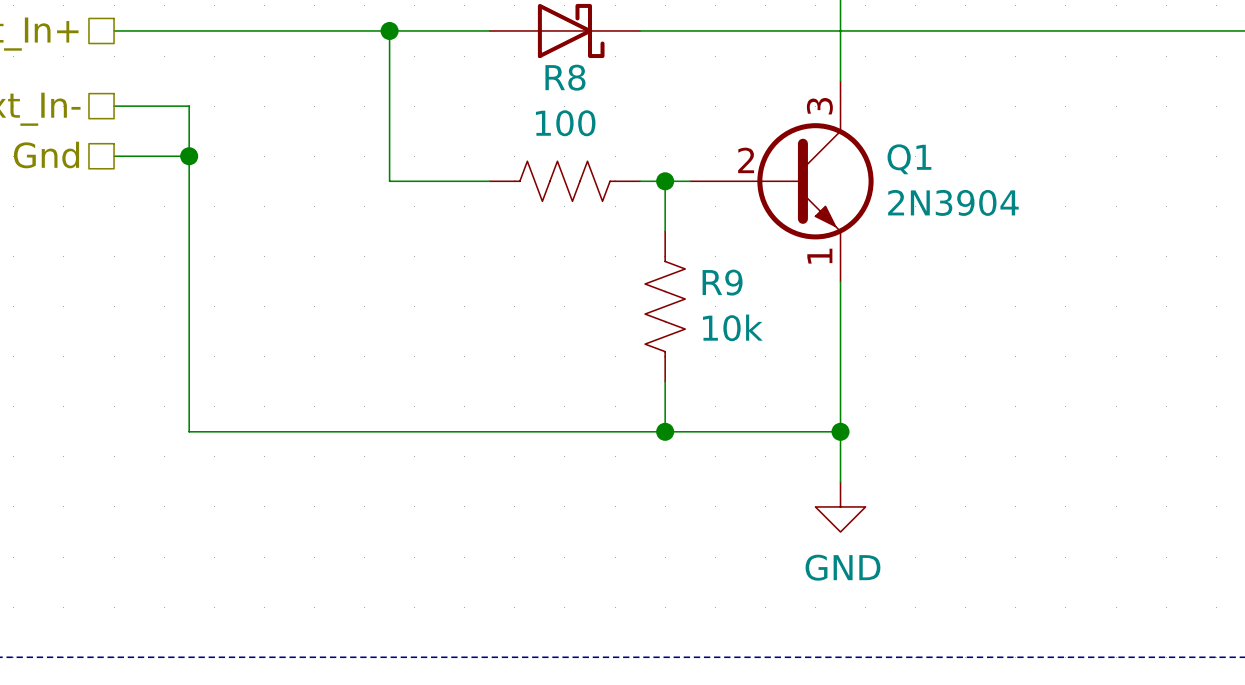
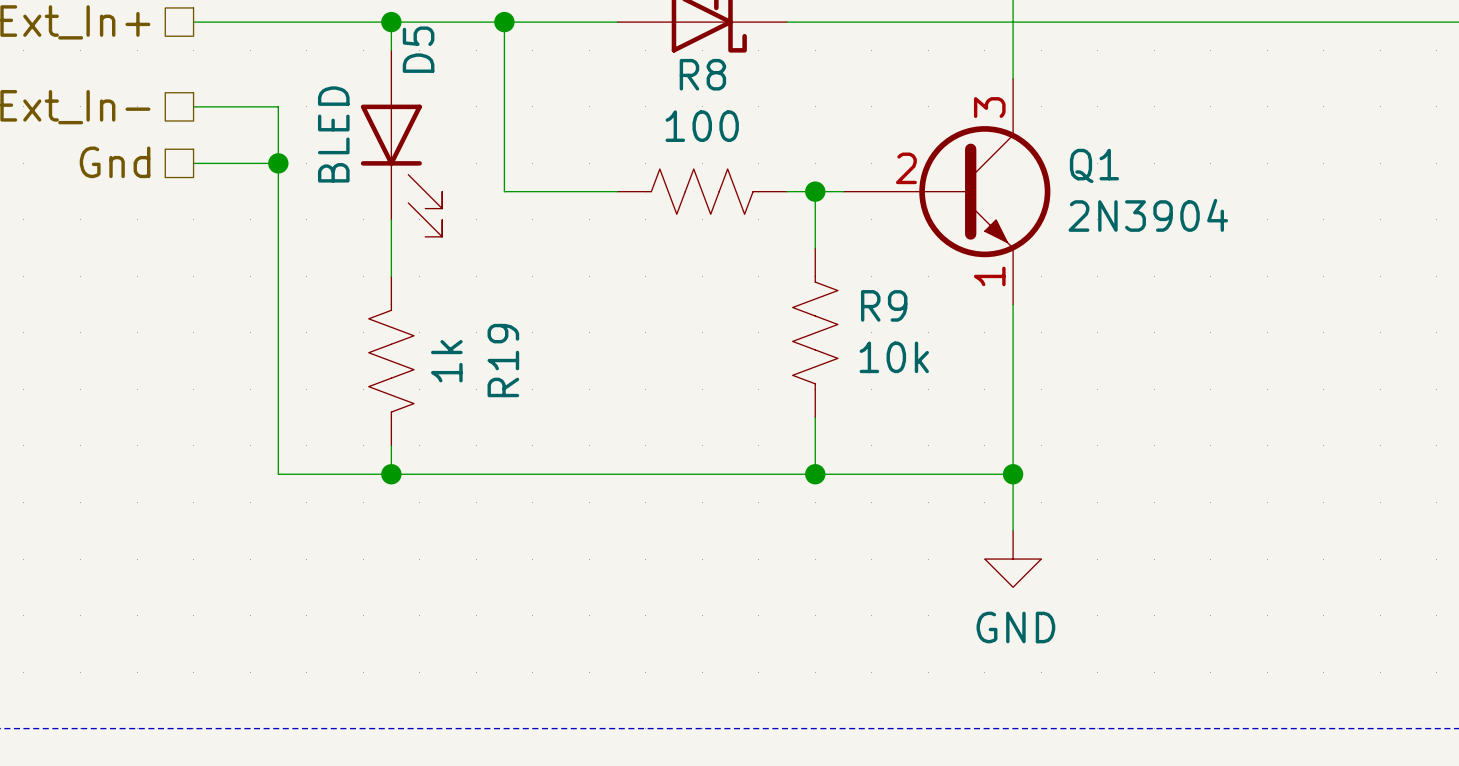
wire: none -> (391, 22) (391, 50)
junction: none -> (391, 22)
D5: none -> BLED (401, 143)
wire: none -> (391, 219) (391, 276)
R19: none -> 1k (391, 361)
wire: none -> (391, 445) (391, 474)
junction: none -> (391, 474)

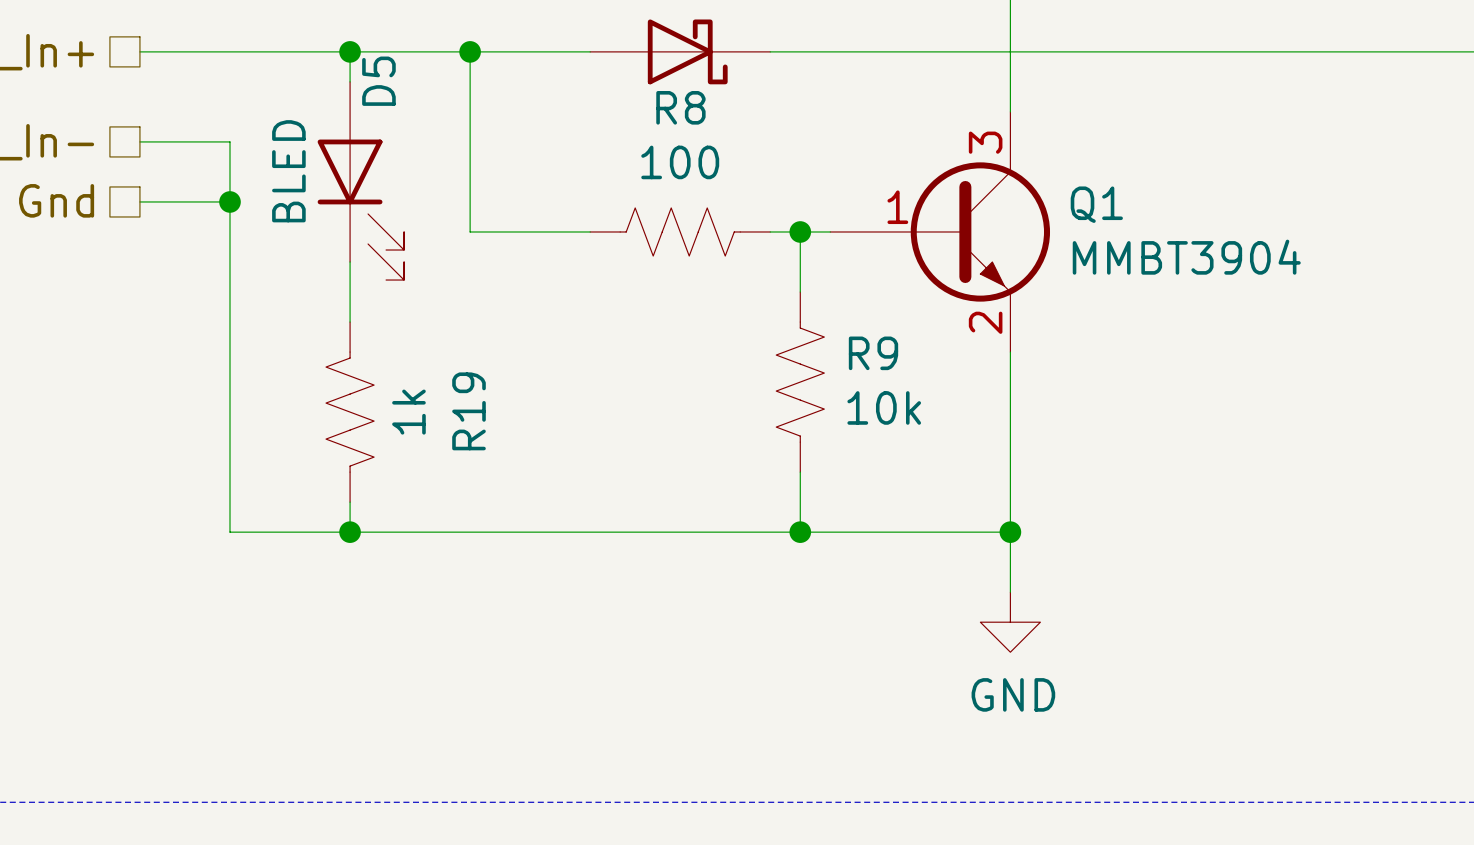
Q1 pin number: 2 (906, 168) -> 1 (897, 207)
Q1 value: 2N3904 (1148, 215) -> MMBT3904 (1186, 257)
Q1 pin number: 1 (989, 276) -> 2 (985, 322)

